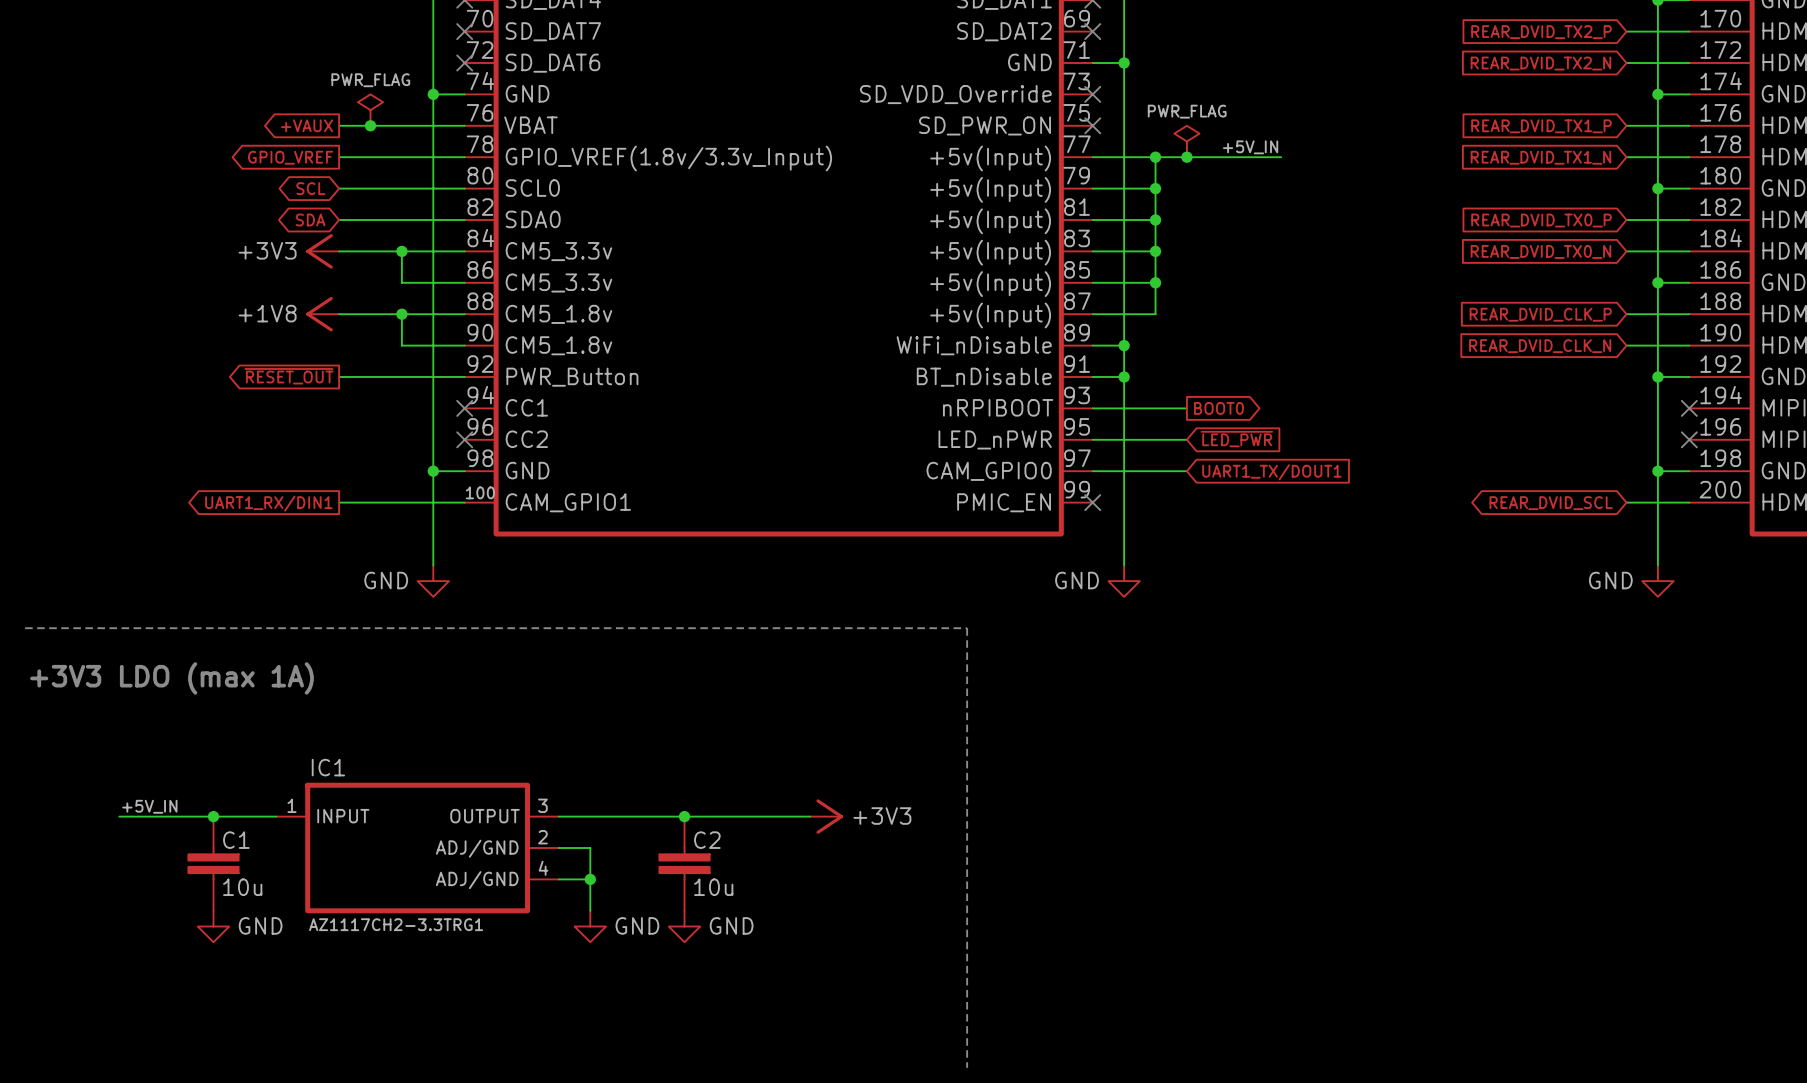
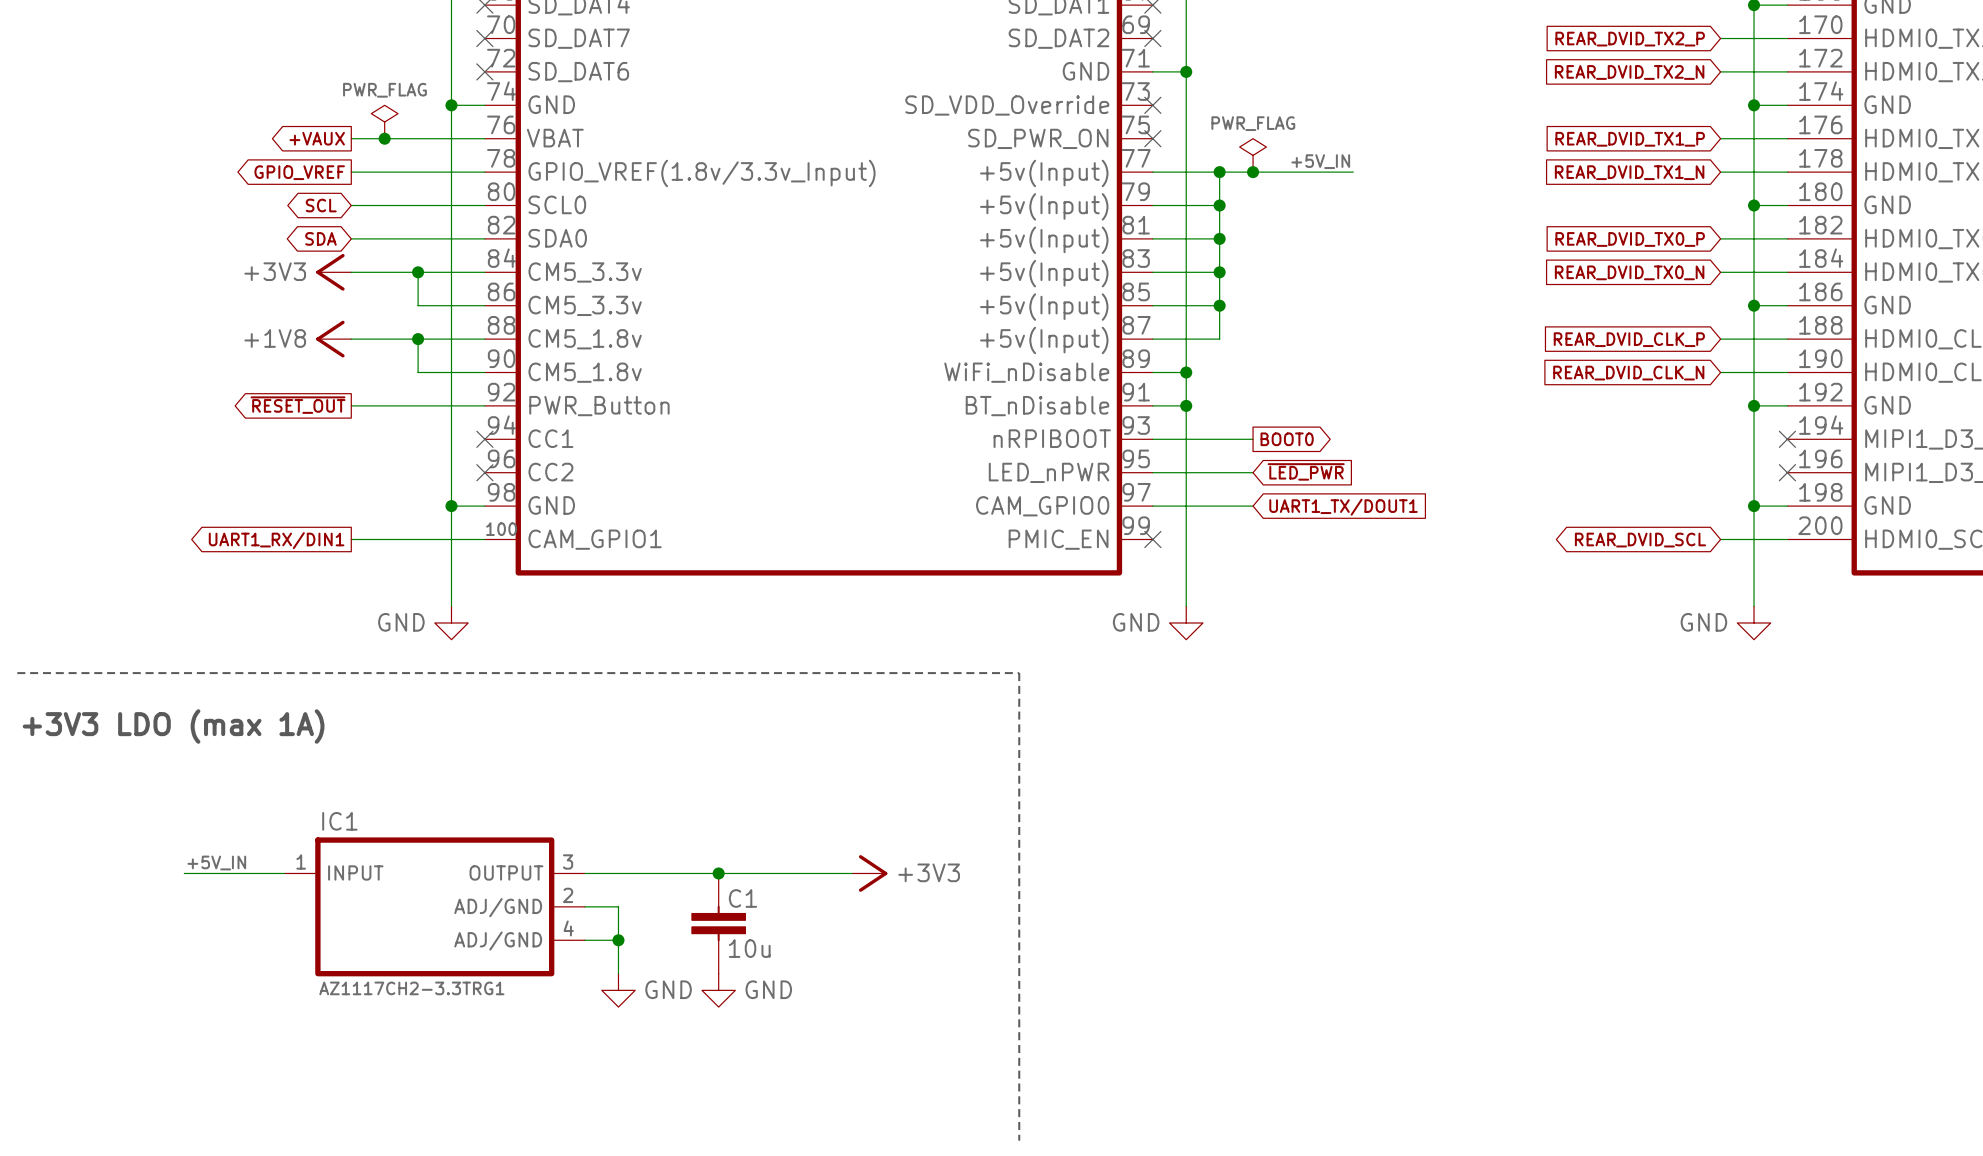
label position: +5V_IN (149, 806) -> +5V_IN (216, 863)
wire: (119, 816) (182, 816) -> none
junction: (213, 816) -> none
C2 name: C2 (707, 840) -> C1 (742, 898)
C1: 10u (213, 863) -> none
power symbol: GND (213, 926) -> none

